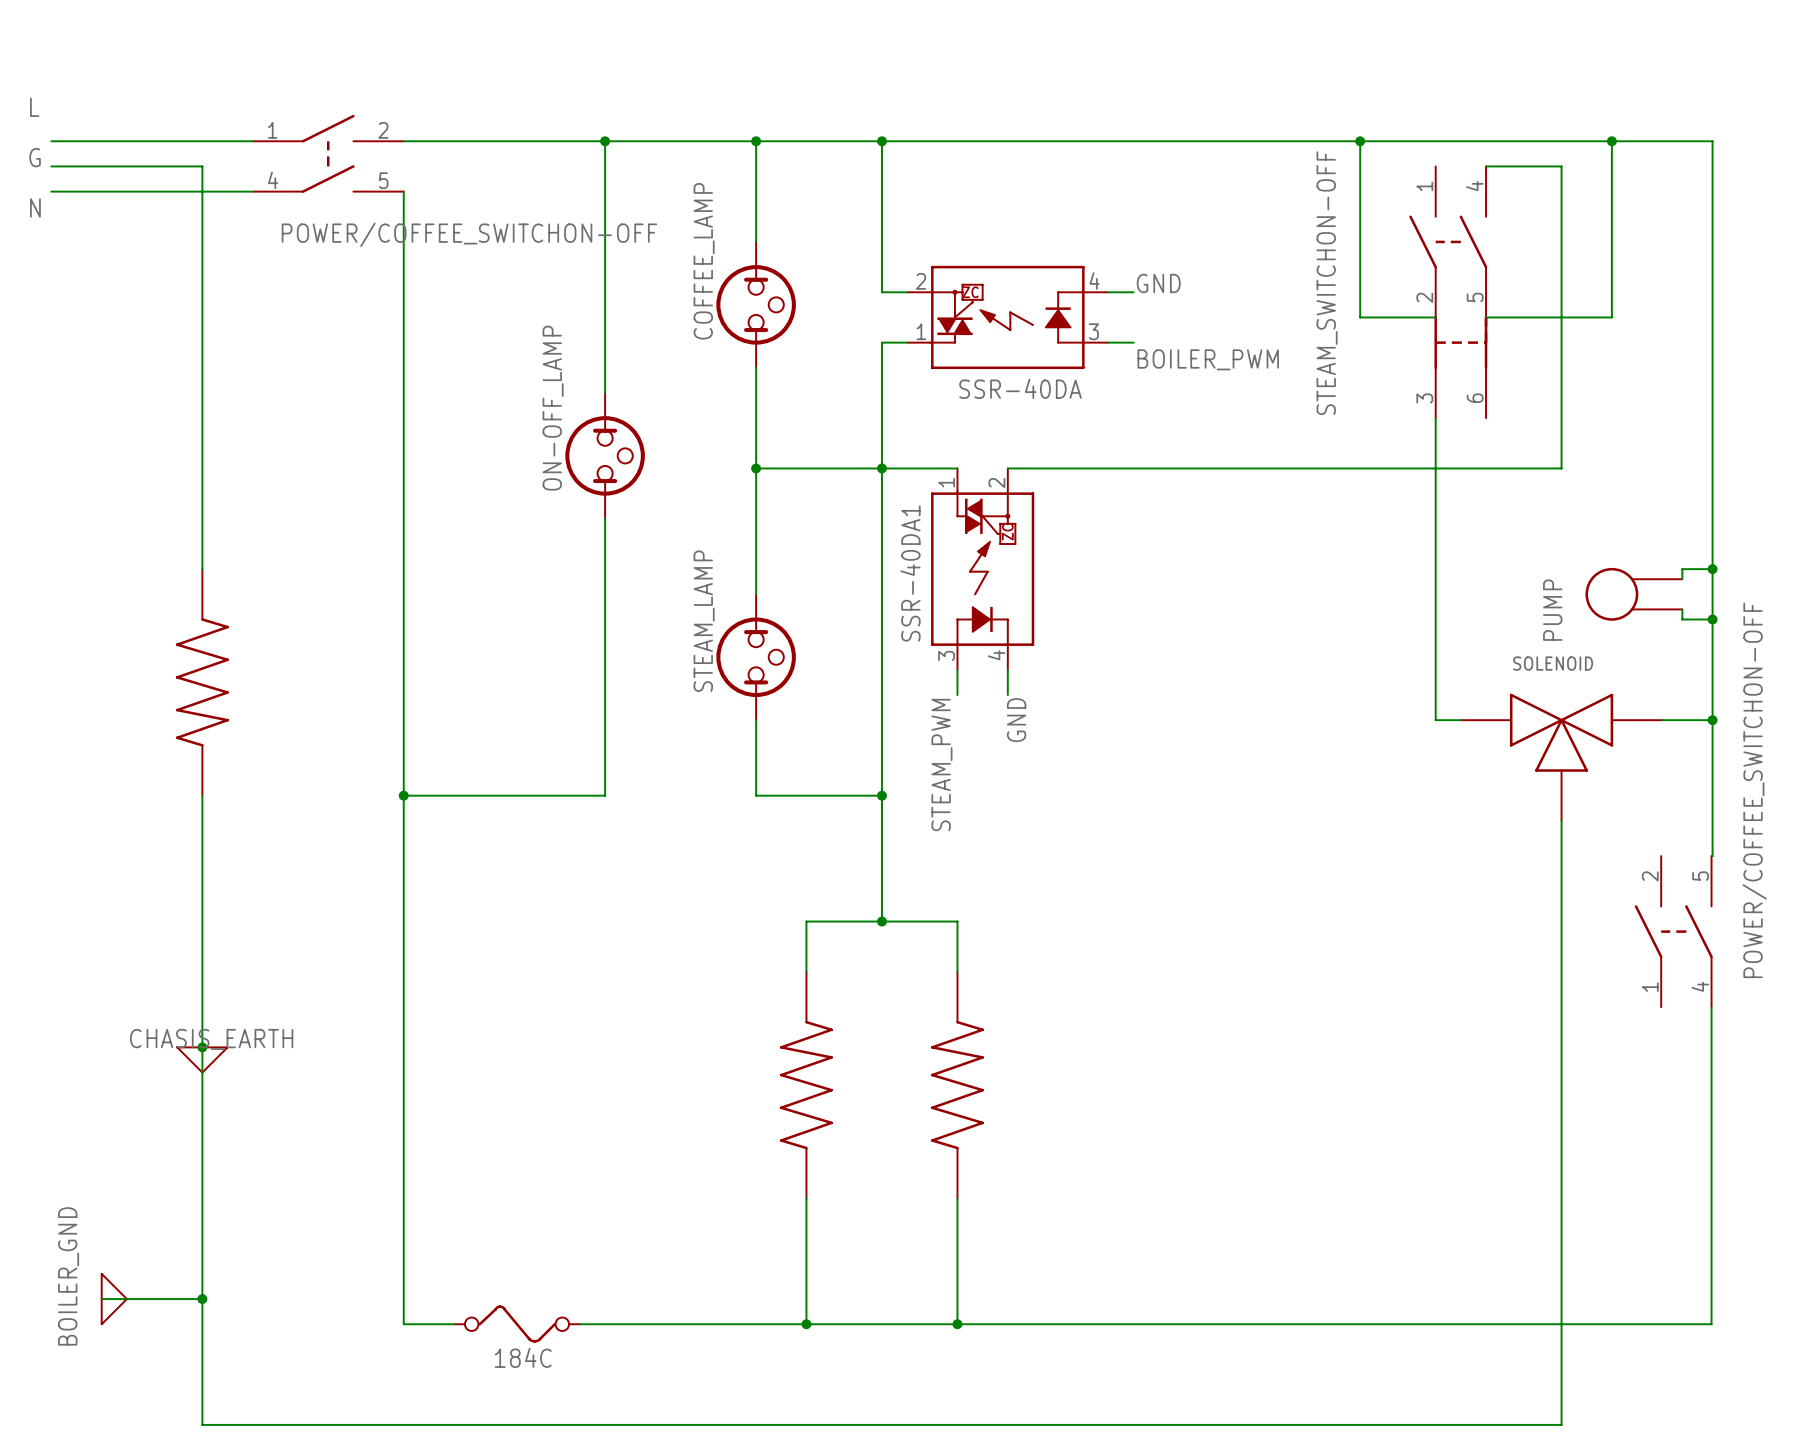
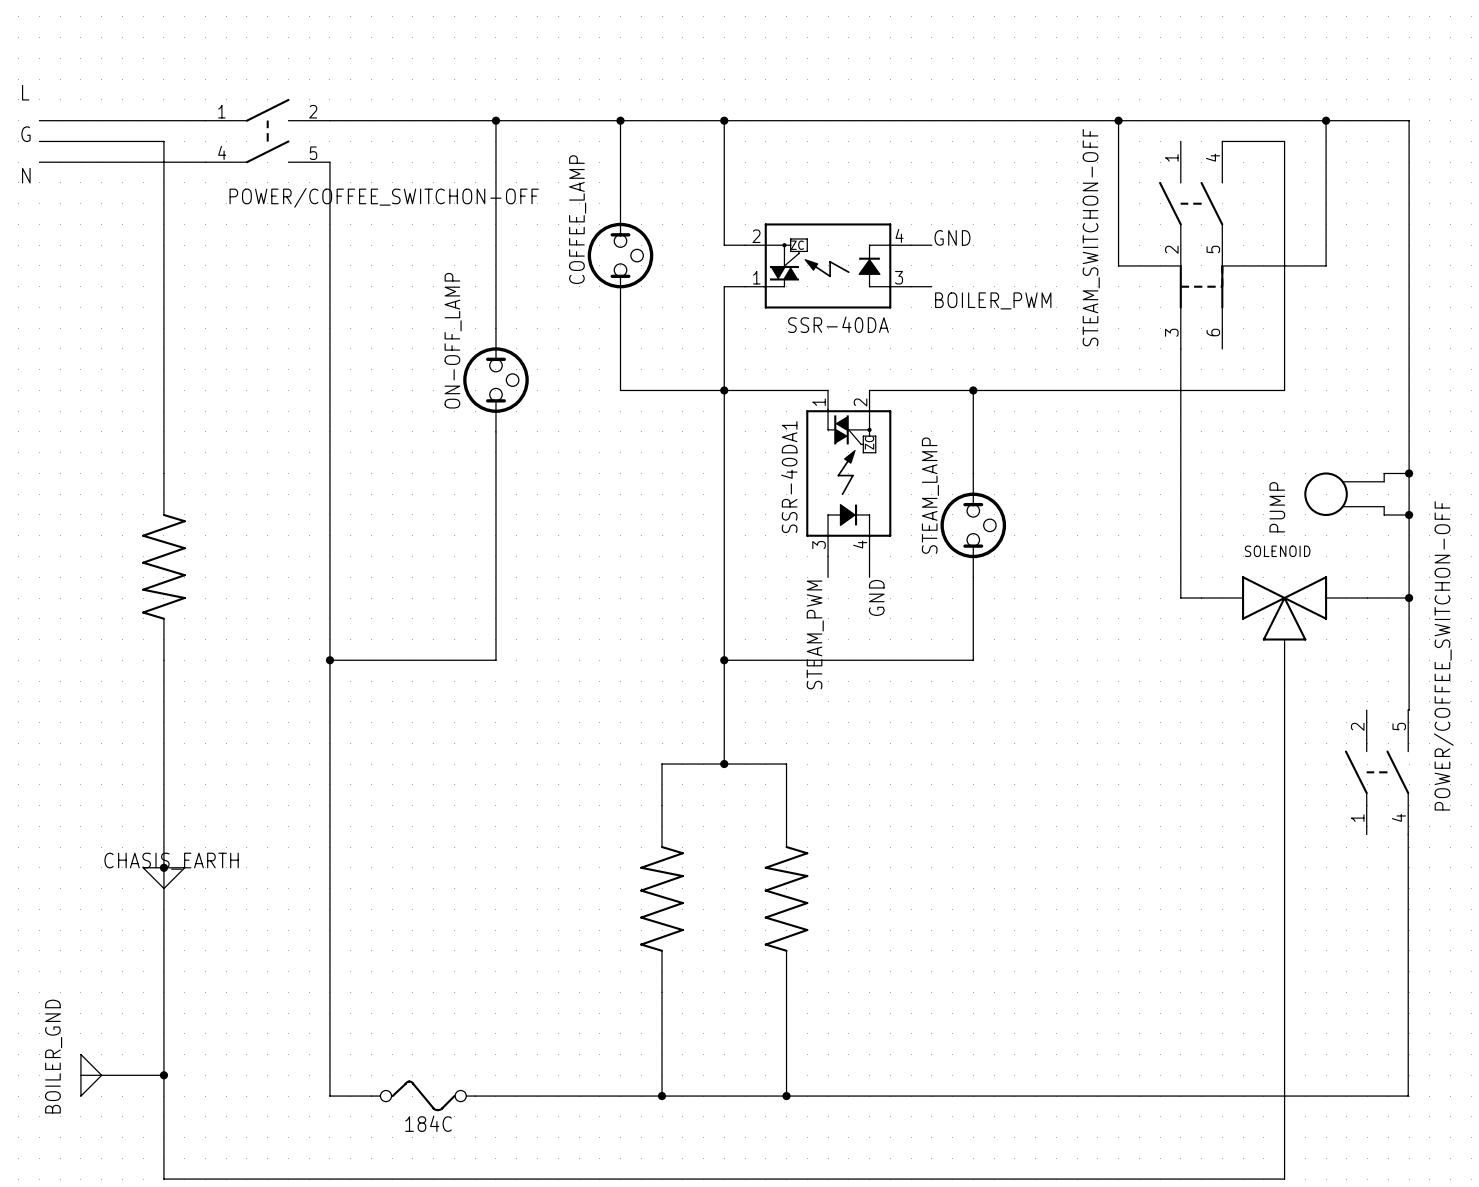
wire: (756, 468) (756, 594) -> none
junction: (756, 468) -> none
wire: (1007, 468) (1058, 468) -> (828, 390) (786, 390)
wire: none -> (973, 390) (973, 473)
junction: none -> (973, 390)
SSR-40DA1 position: (982, 569) -> (848, 473)
STEAM_LAMP: none -> (973, 525)
STEAM_LAMP: (756, 657) -> none
wire: (957, 669) (957, 695) -> (869, 556) (869, 577)
wire: (756, 720) (756, 795) (881, 795) -> (973, 577) (973, 660) (724, 660)
label position: GND (1016, 720) -> GND (876, 597)
label position: STEAM_PWM (941, 765) -> STEAM_PWM (815, 634)

